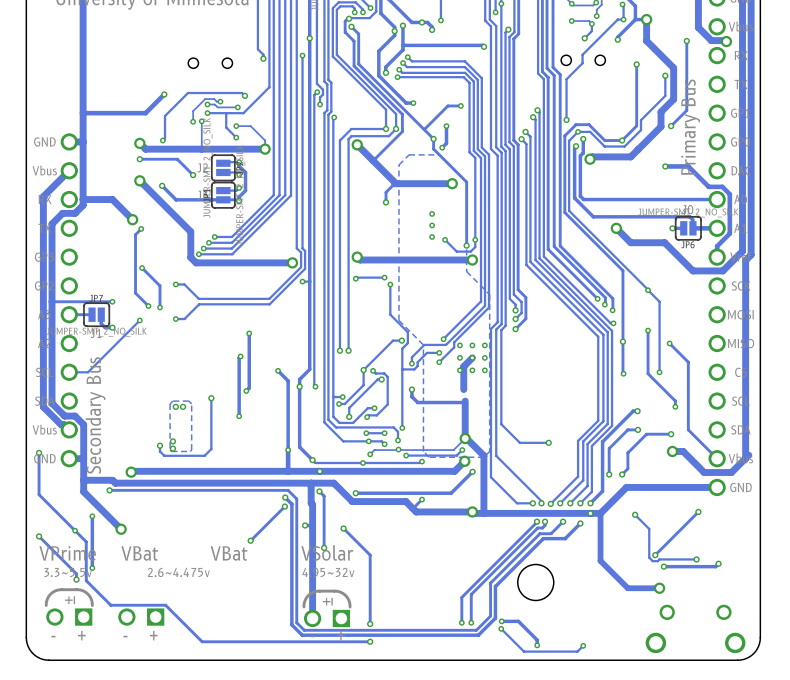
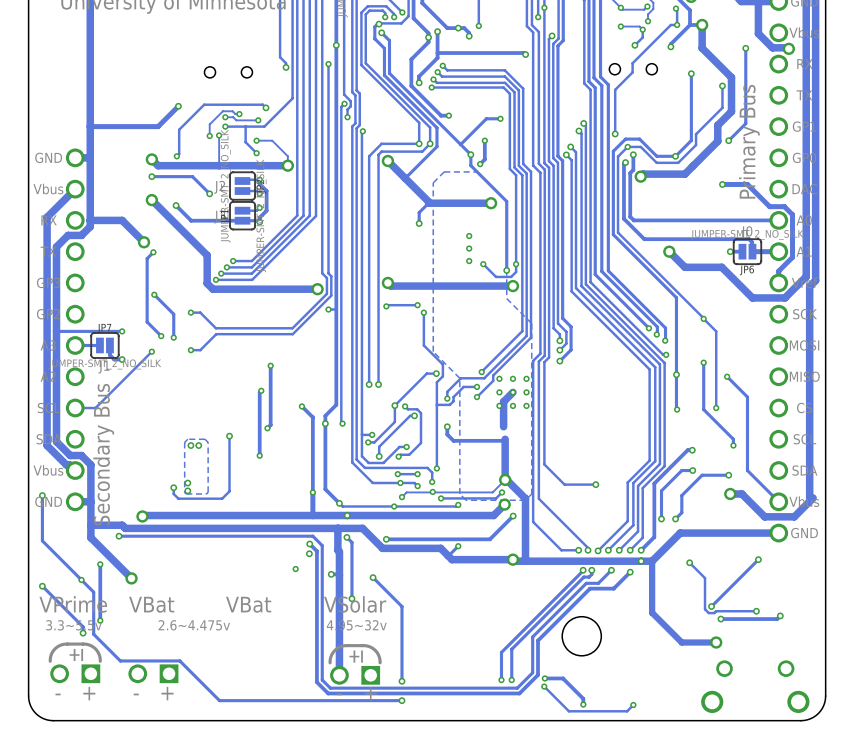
track: (284, 506) (250, 540) -> none
via: none -> (295, 569)
via: (250, 540) -> none

